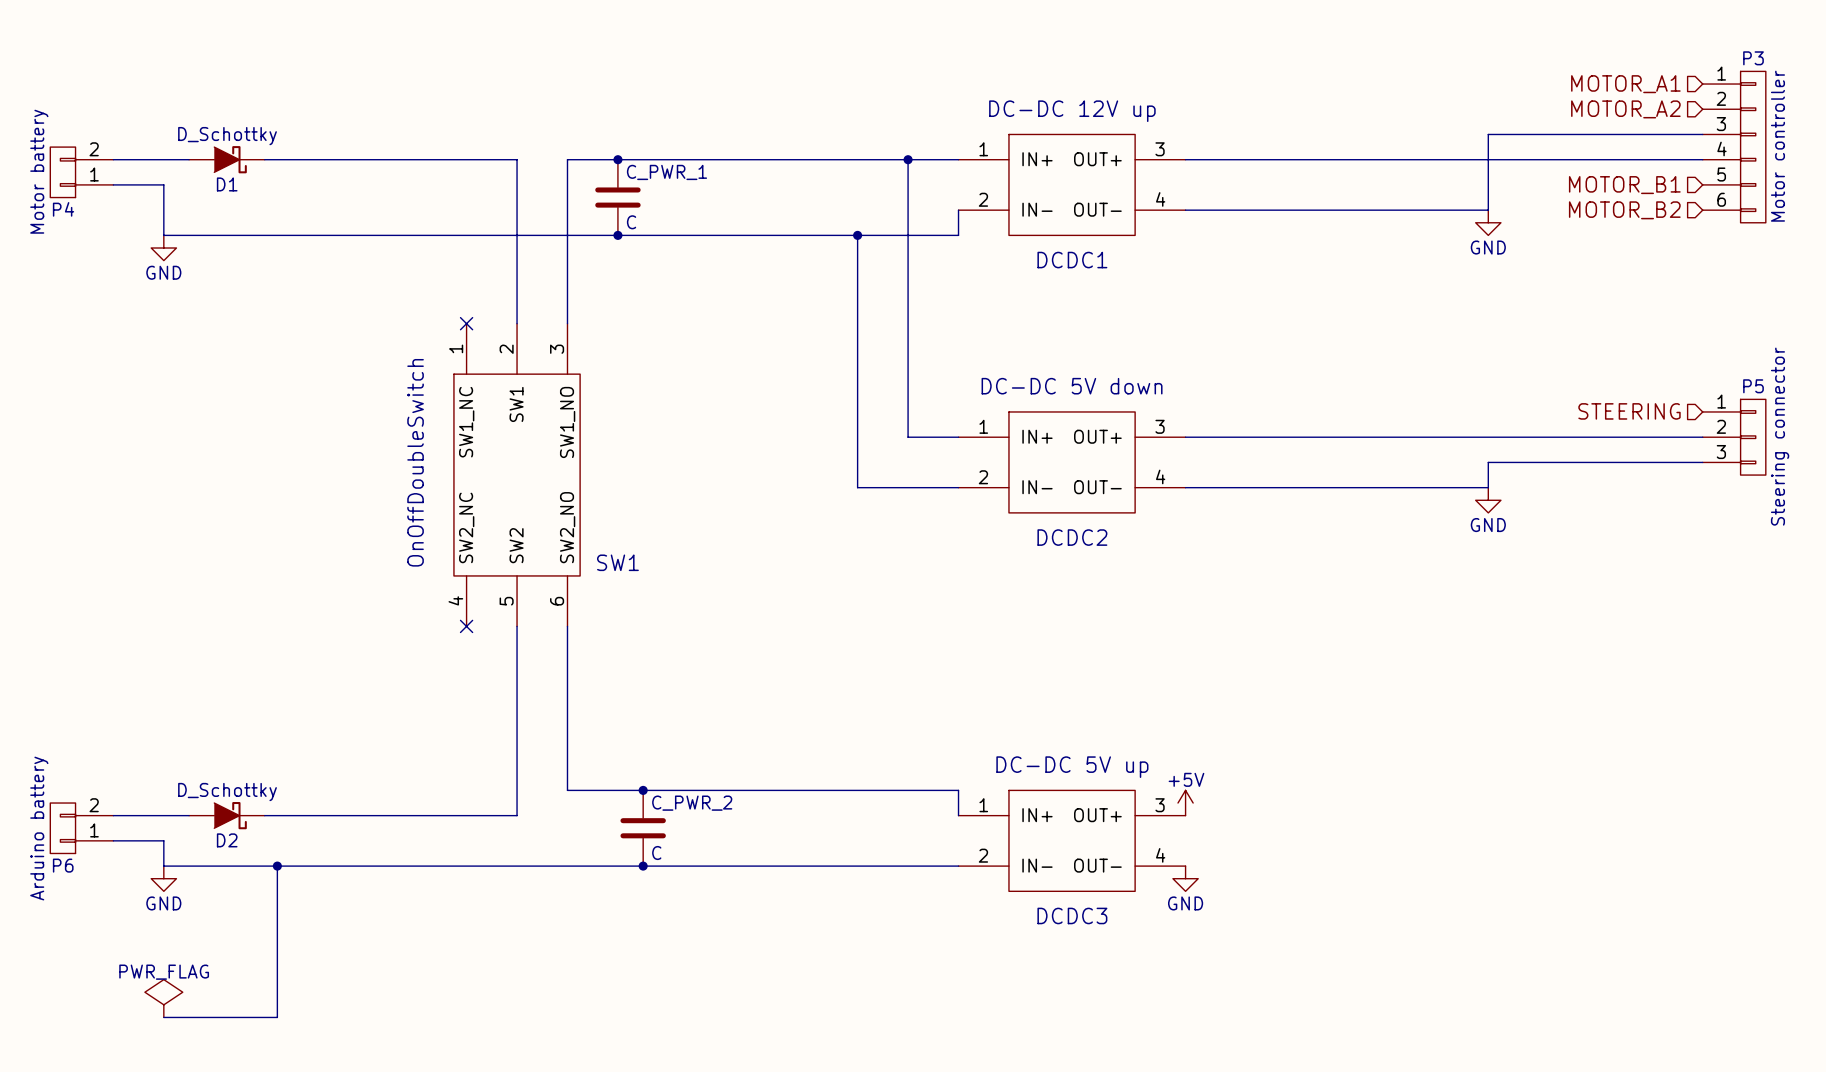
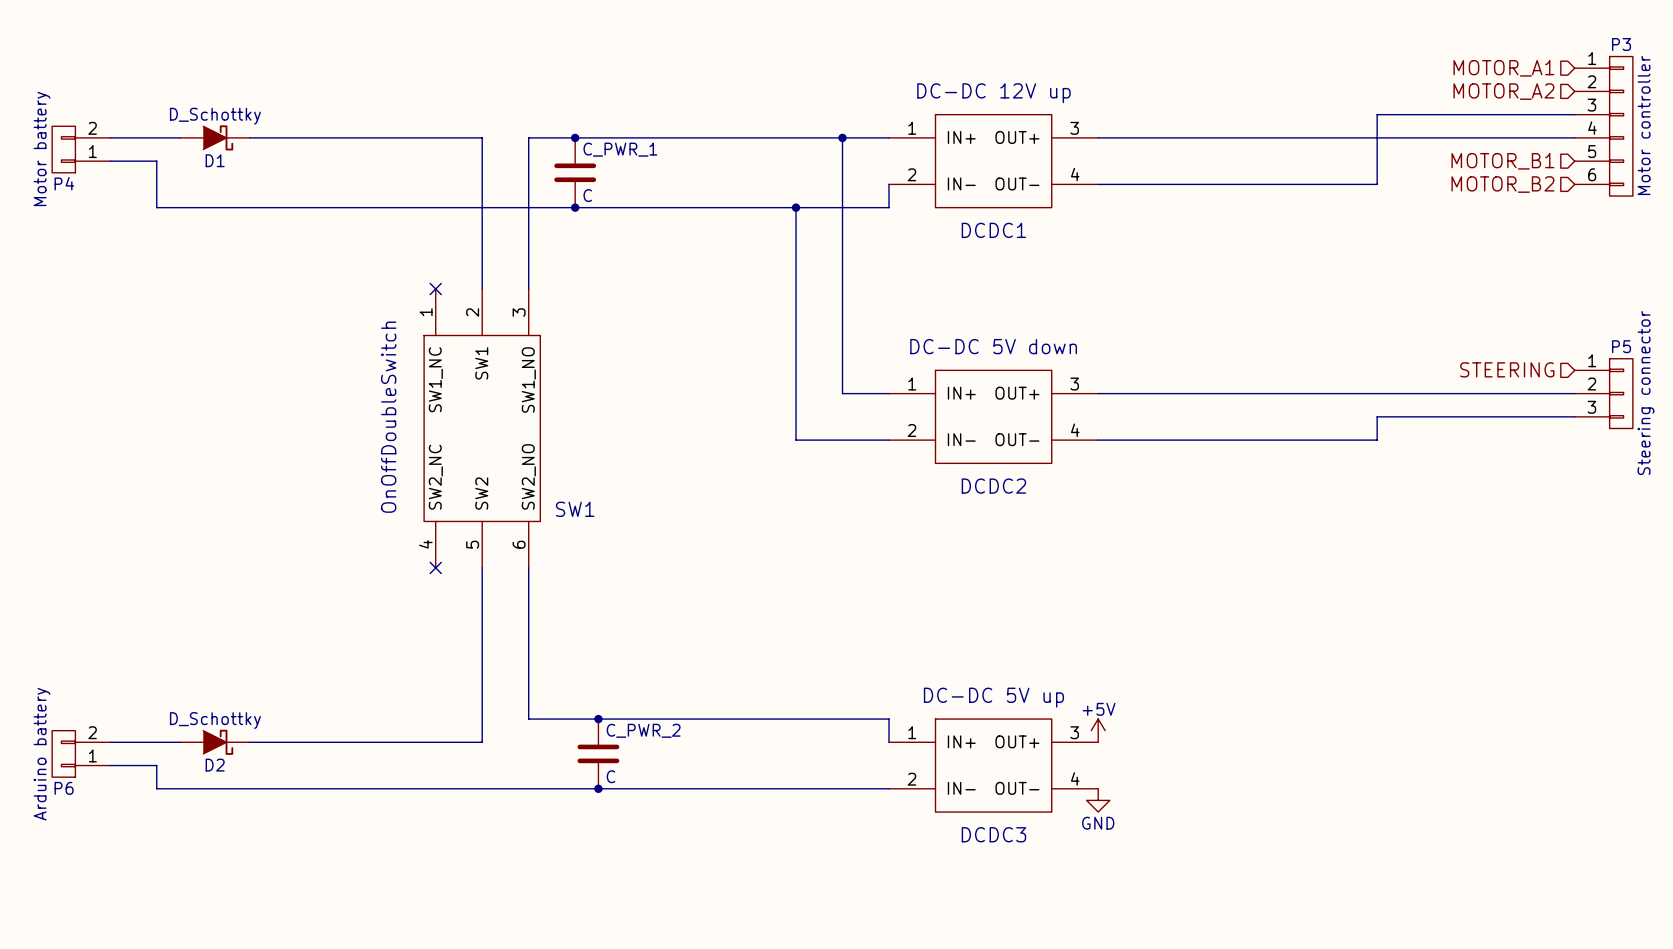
power symbol: GND (1488, 222) -> none
power symbol: GND (163, 248) -> none
power symbol: GND (1488, 500) -> none
wire: (277, 866) (277, 1017) (163, 1017) -> none
junction: (277, 866) -> none
power symbol: GND (163, 878) -> none
power symbol: PWR_FLAG (163, 998) -> none

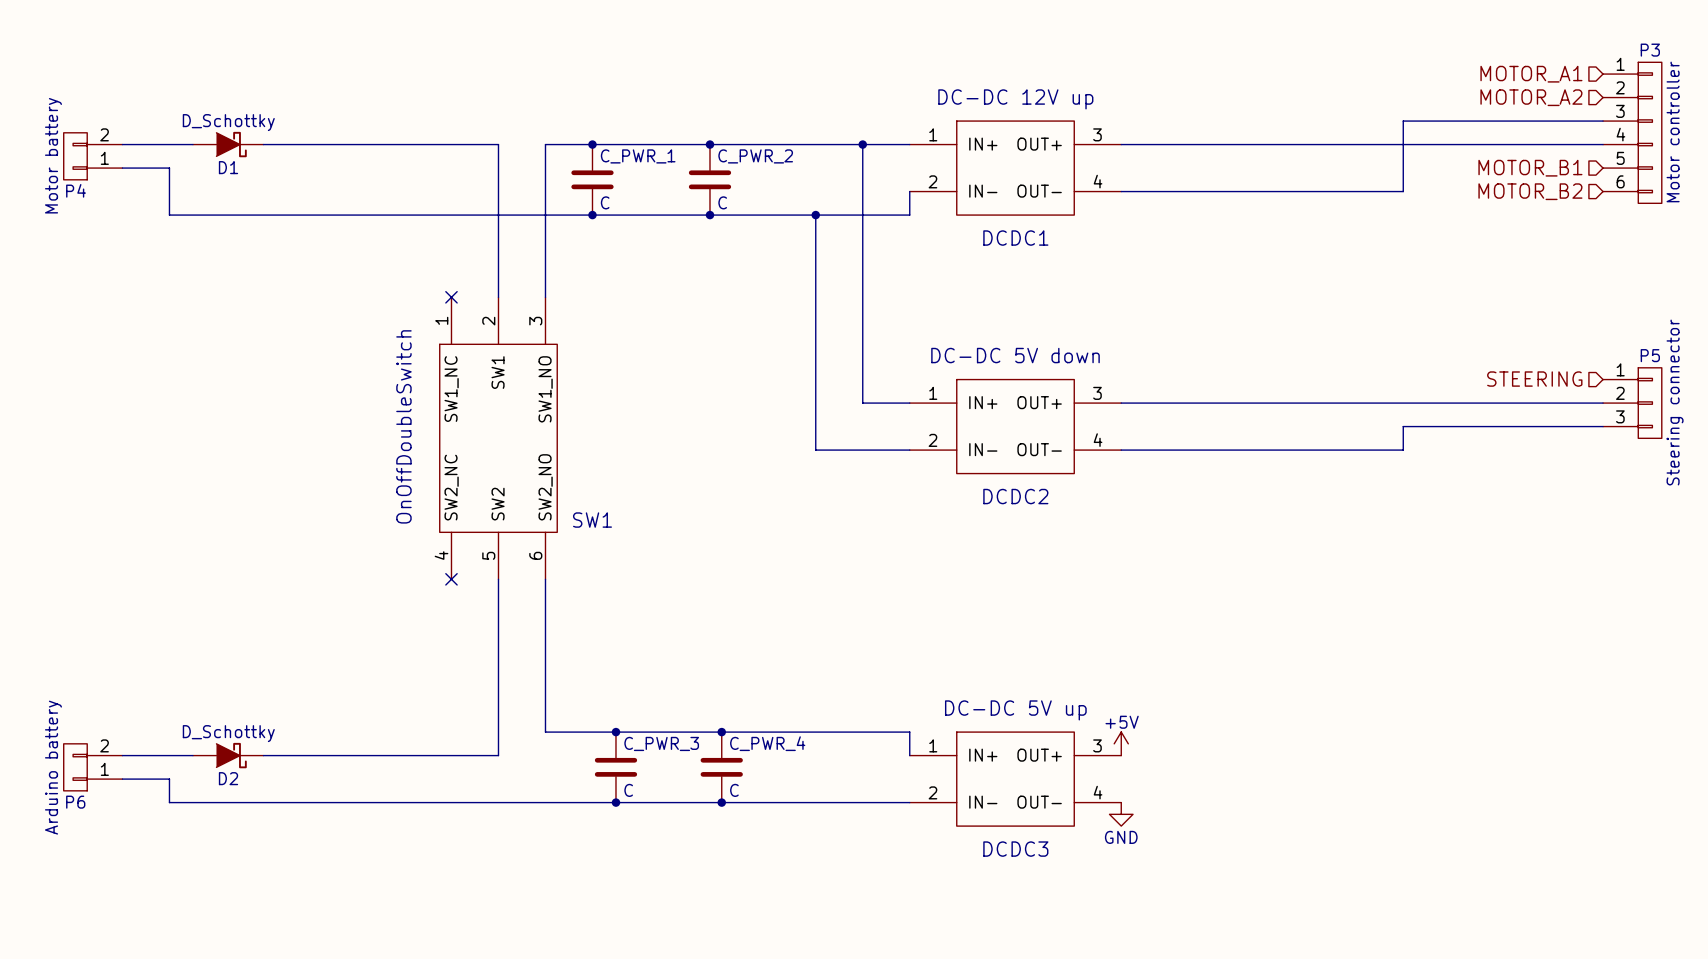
junction: none -> (709, 144)
C_PWR_2: none -> C (709, 179)
junction: none -> (709, 215)
junction: none -> (721, 732)
C_PWR_2 name: C_PWR_2 (643, 730) -> C_PWR_3 (661, 743)
C_PWR_4: none -> C (721, 767)
junction: none -> (721, 802)

